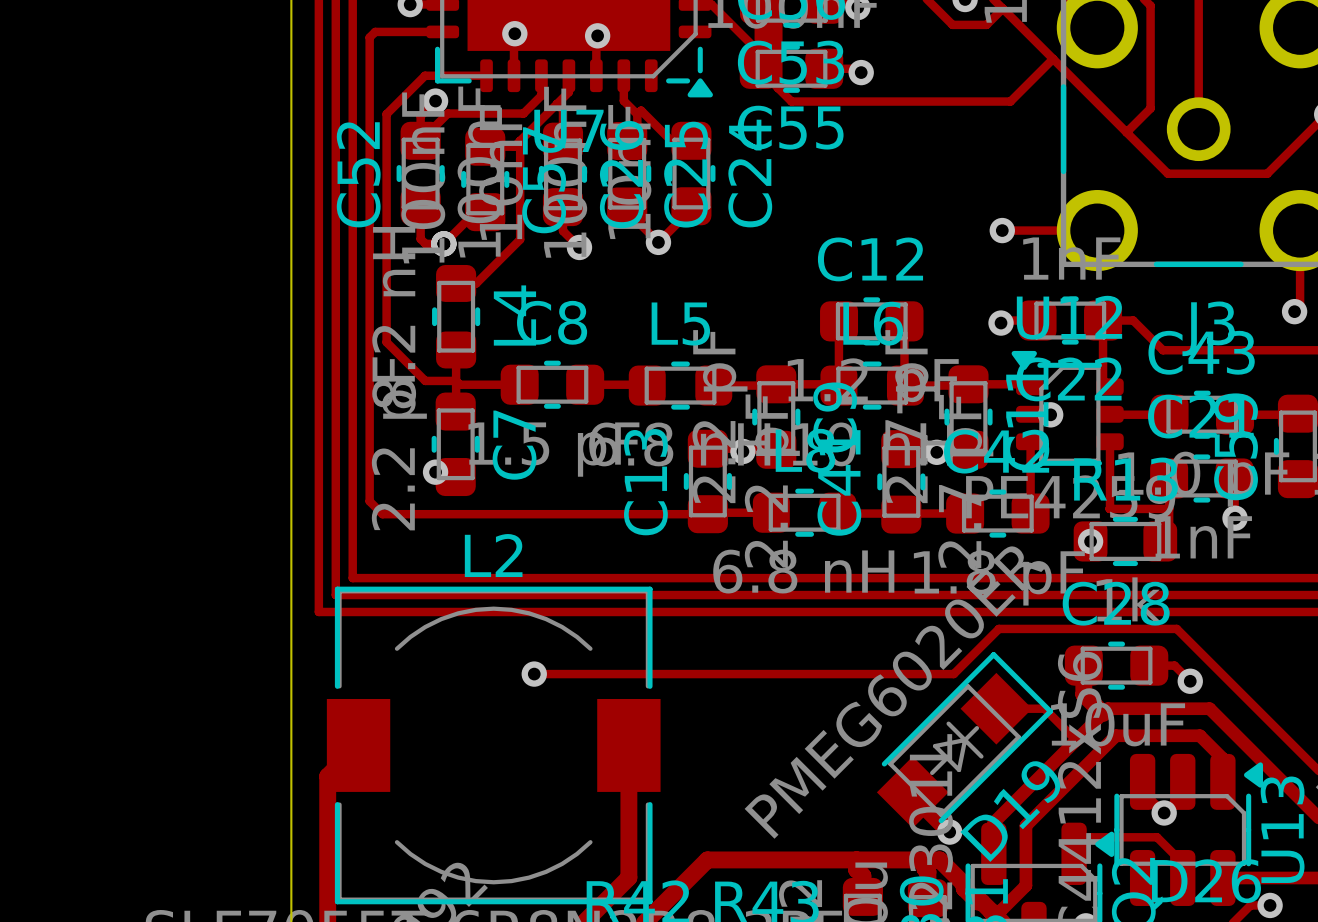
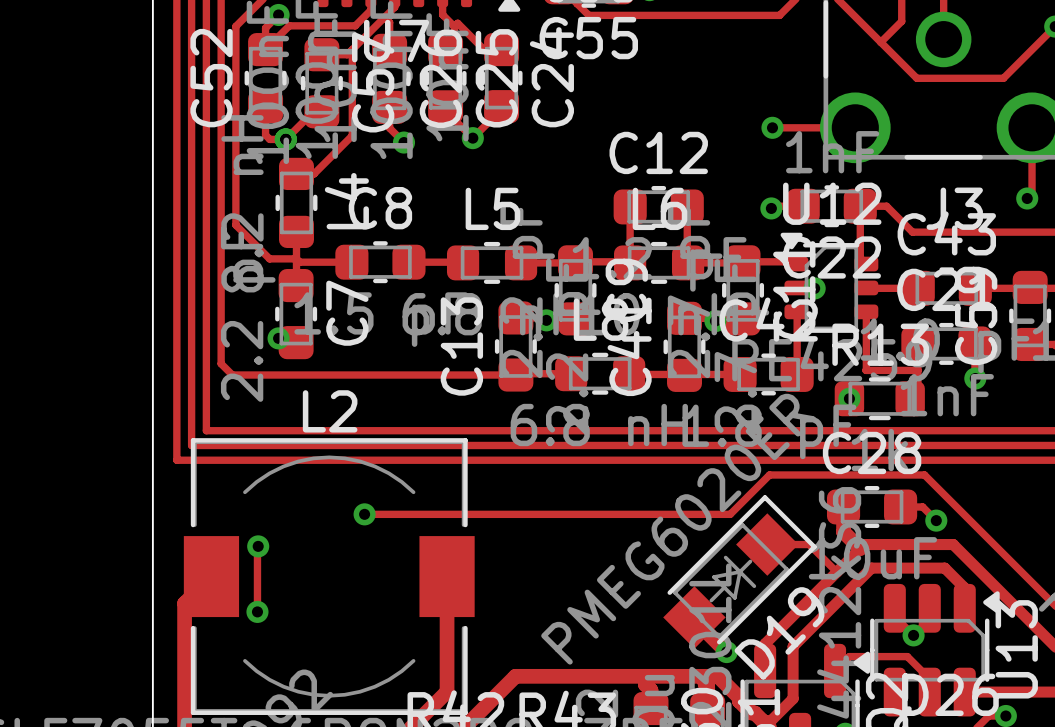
track: none -> (258, 546) (257, 611)
via: none -> (258, 546)
via: none -> (257, 611)

